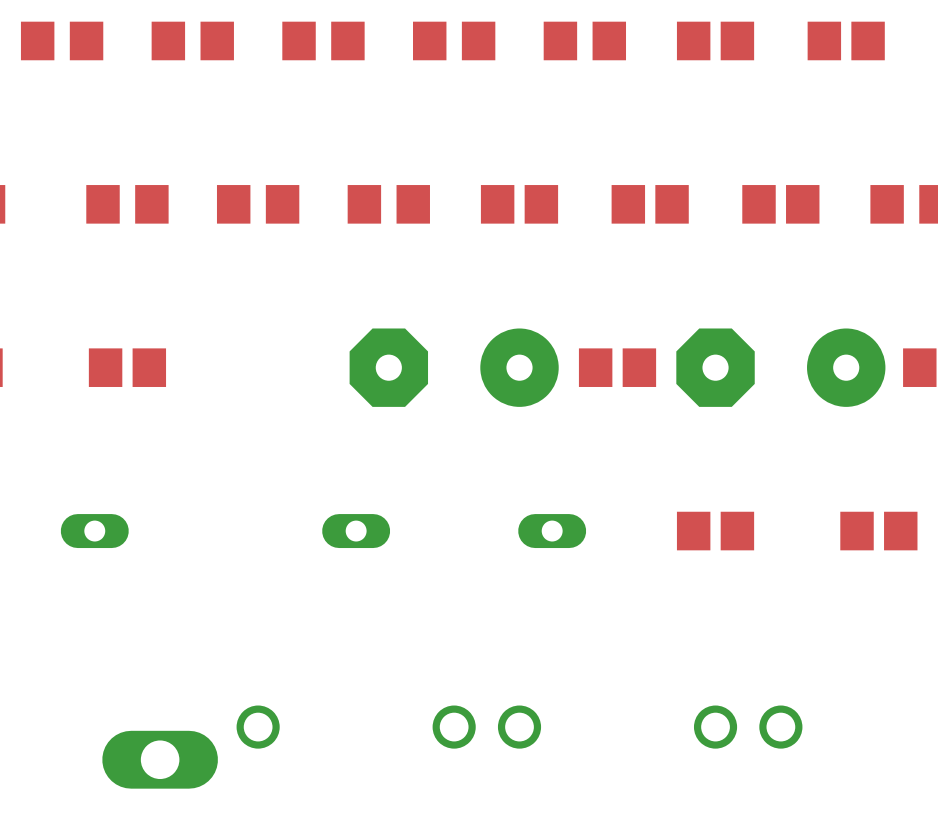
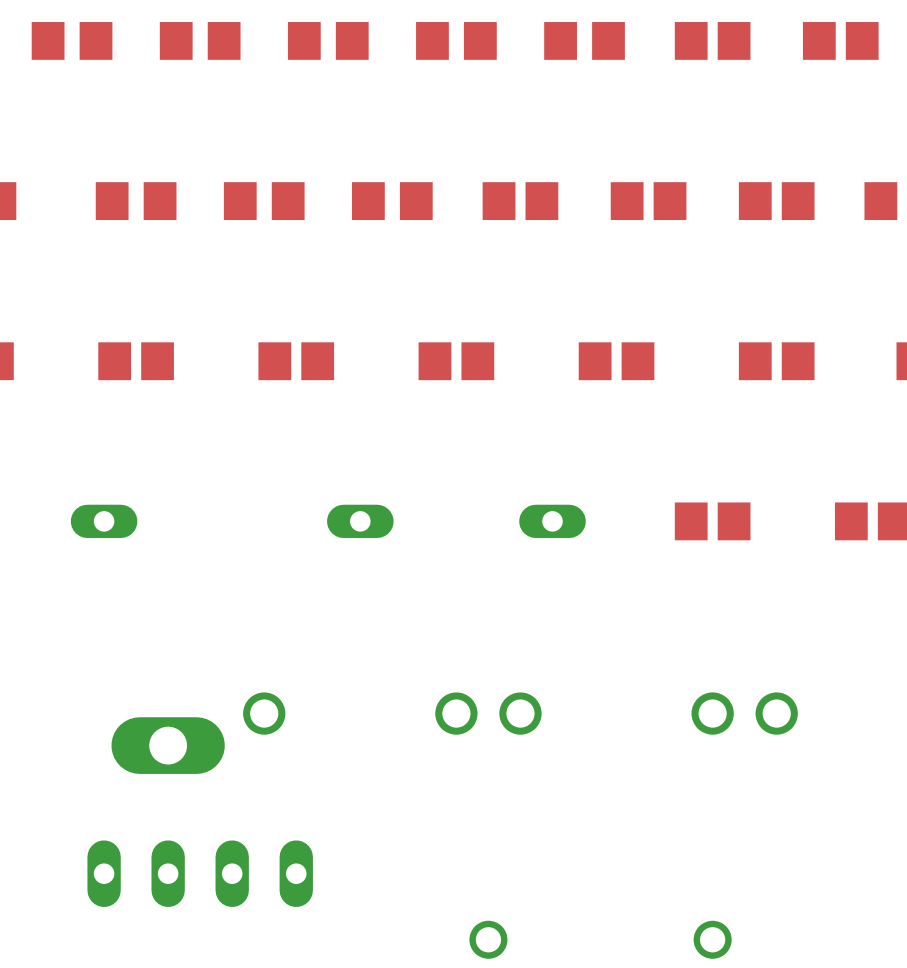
part footprint: [349, 328, 559, 407] -> [418, 342, 495, 381]
part footprint: [676, 328, 886, 407] -> [738, 342, 815, 381]
part: none -> (296, 361)

